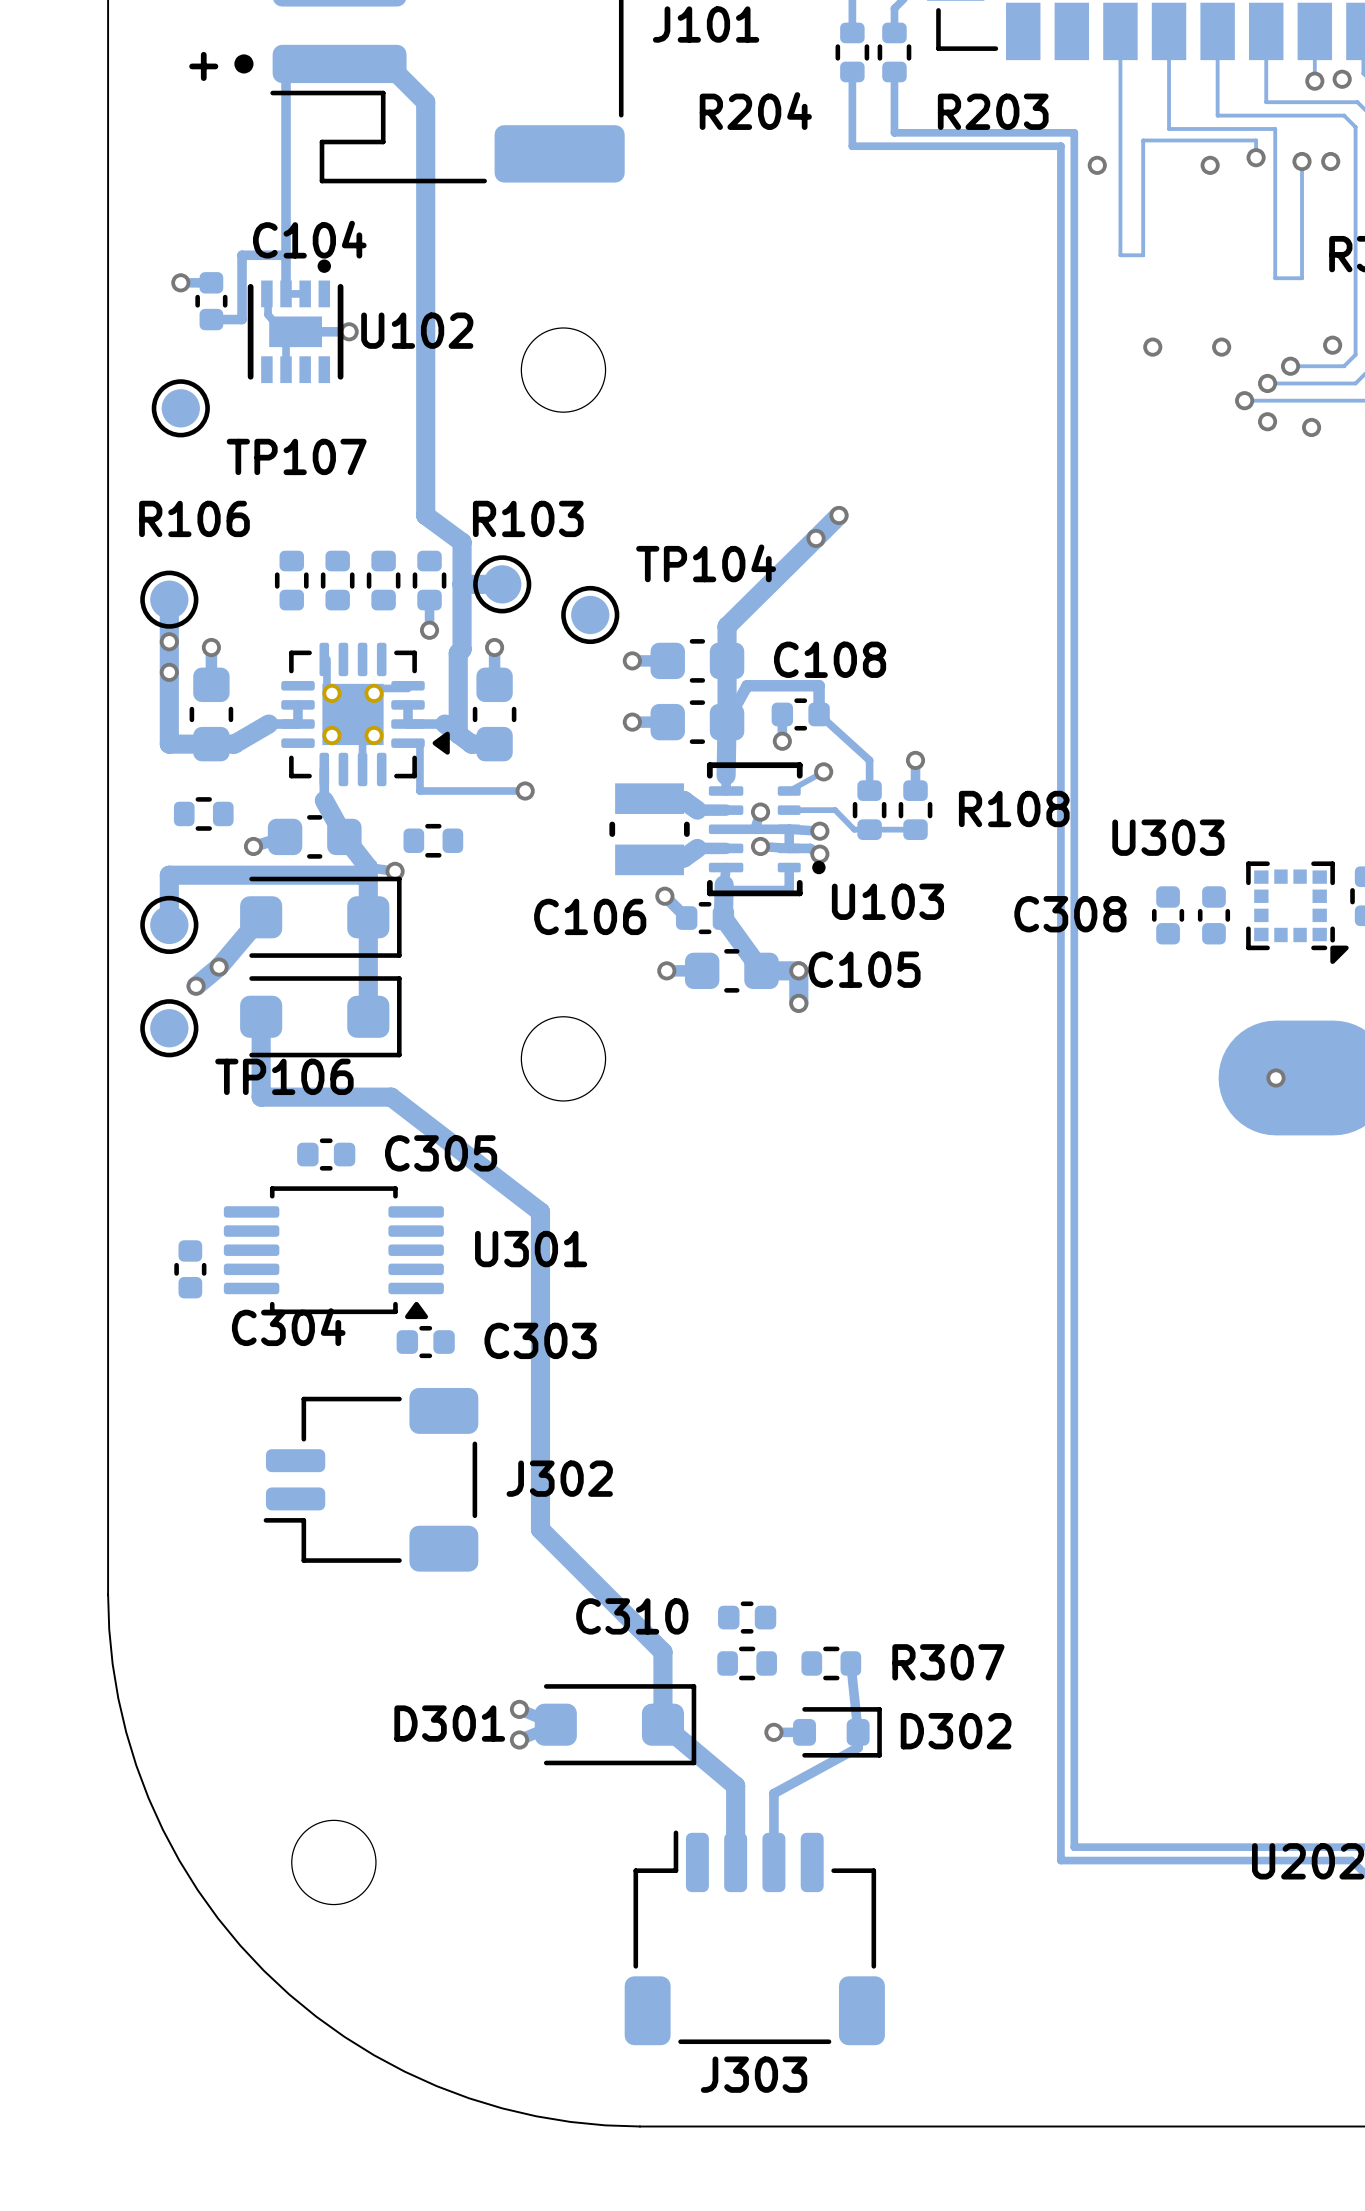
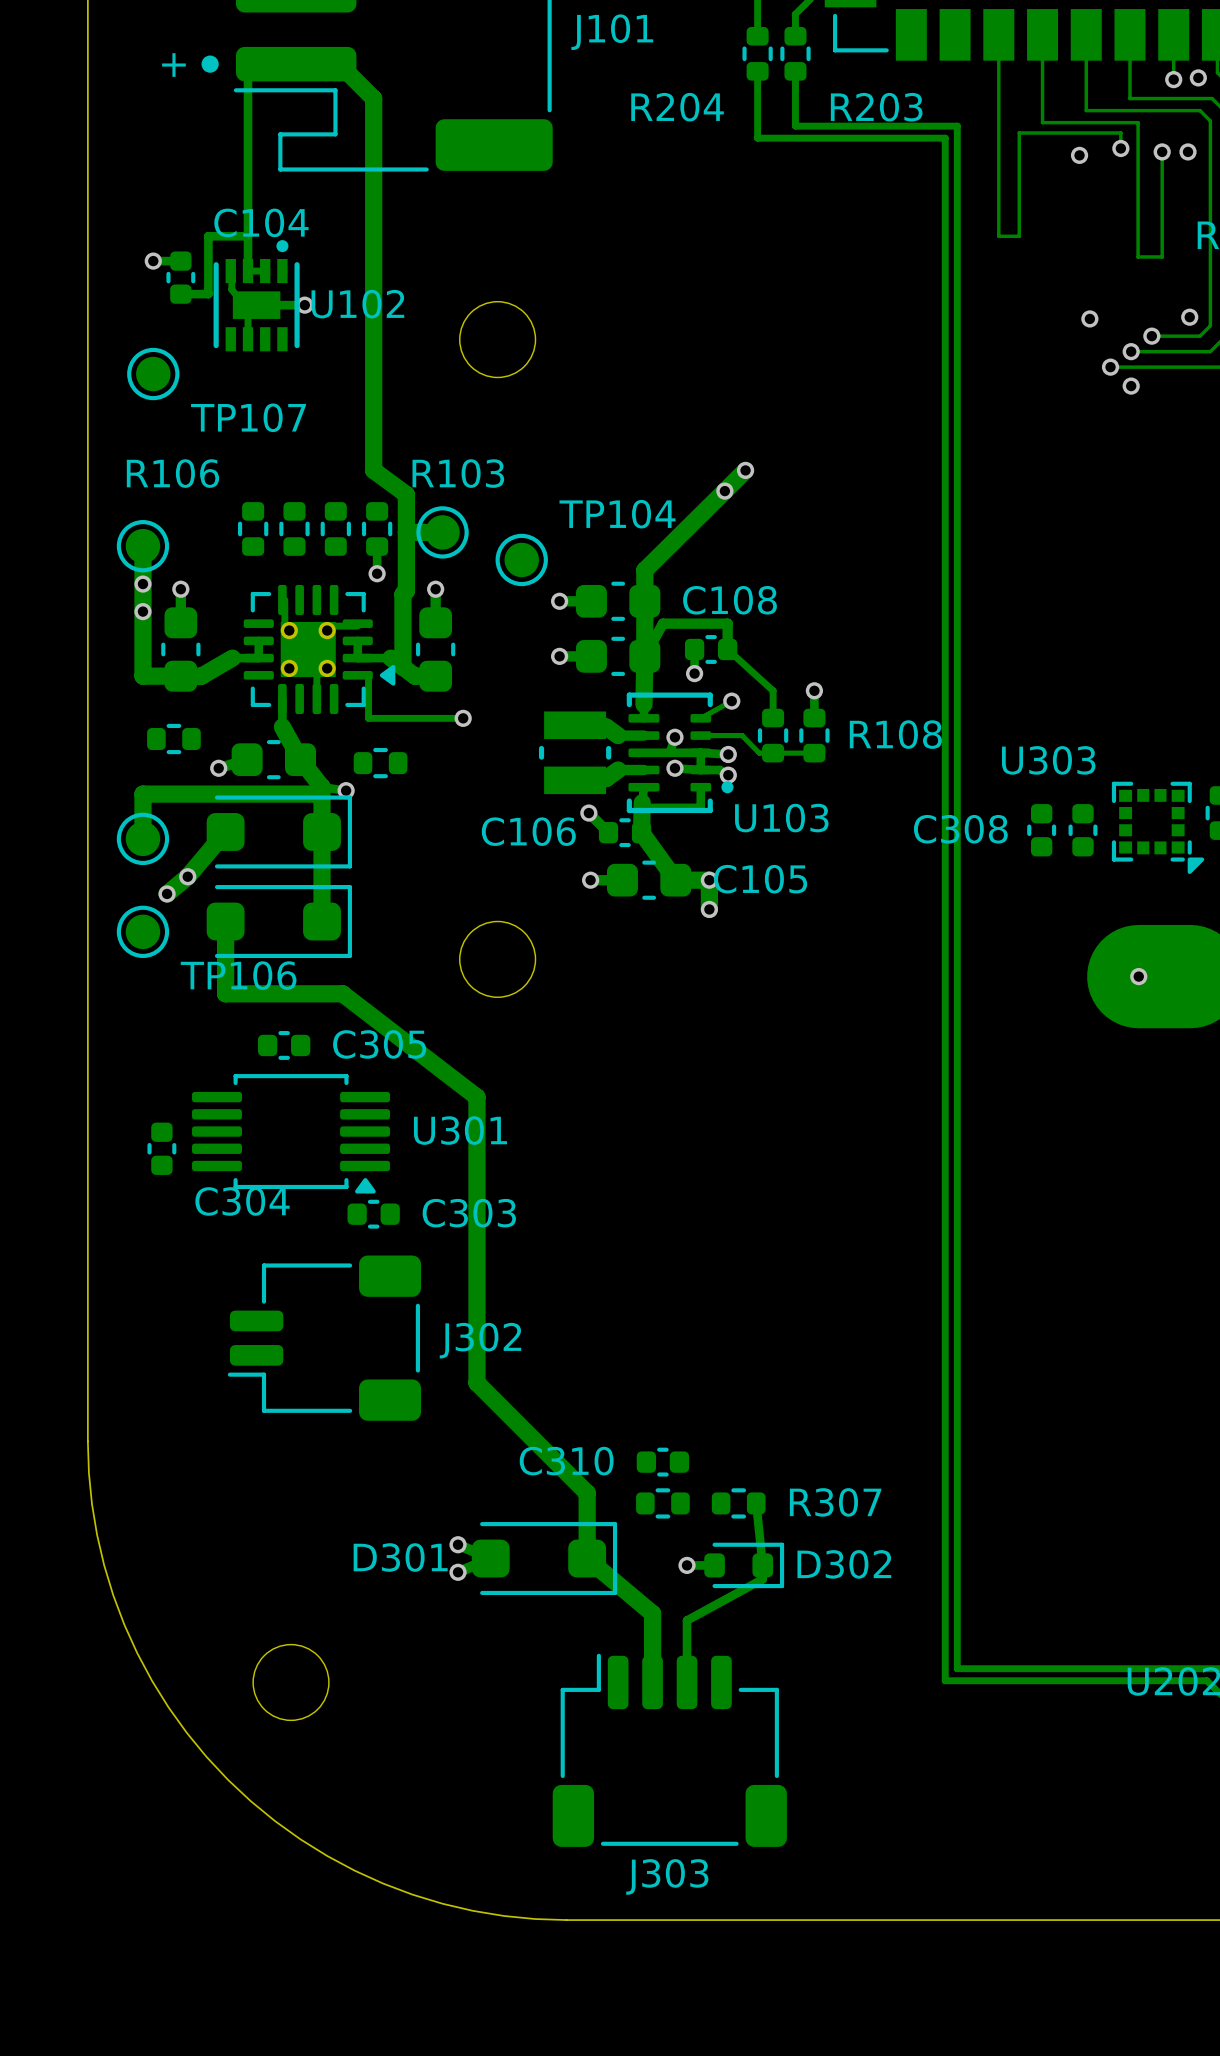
via: (1097, 165) -> none
via: (1152, 347) -> none
via: (1311, 427) -> none

